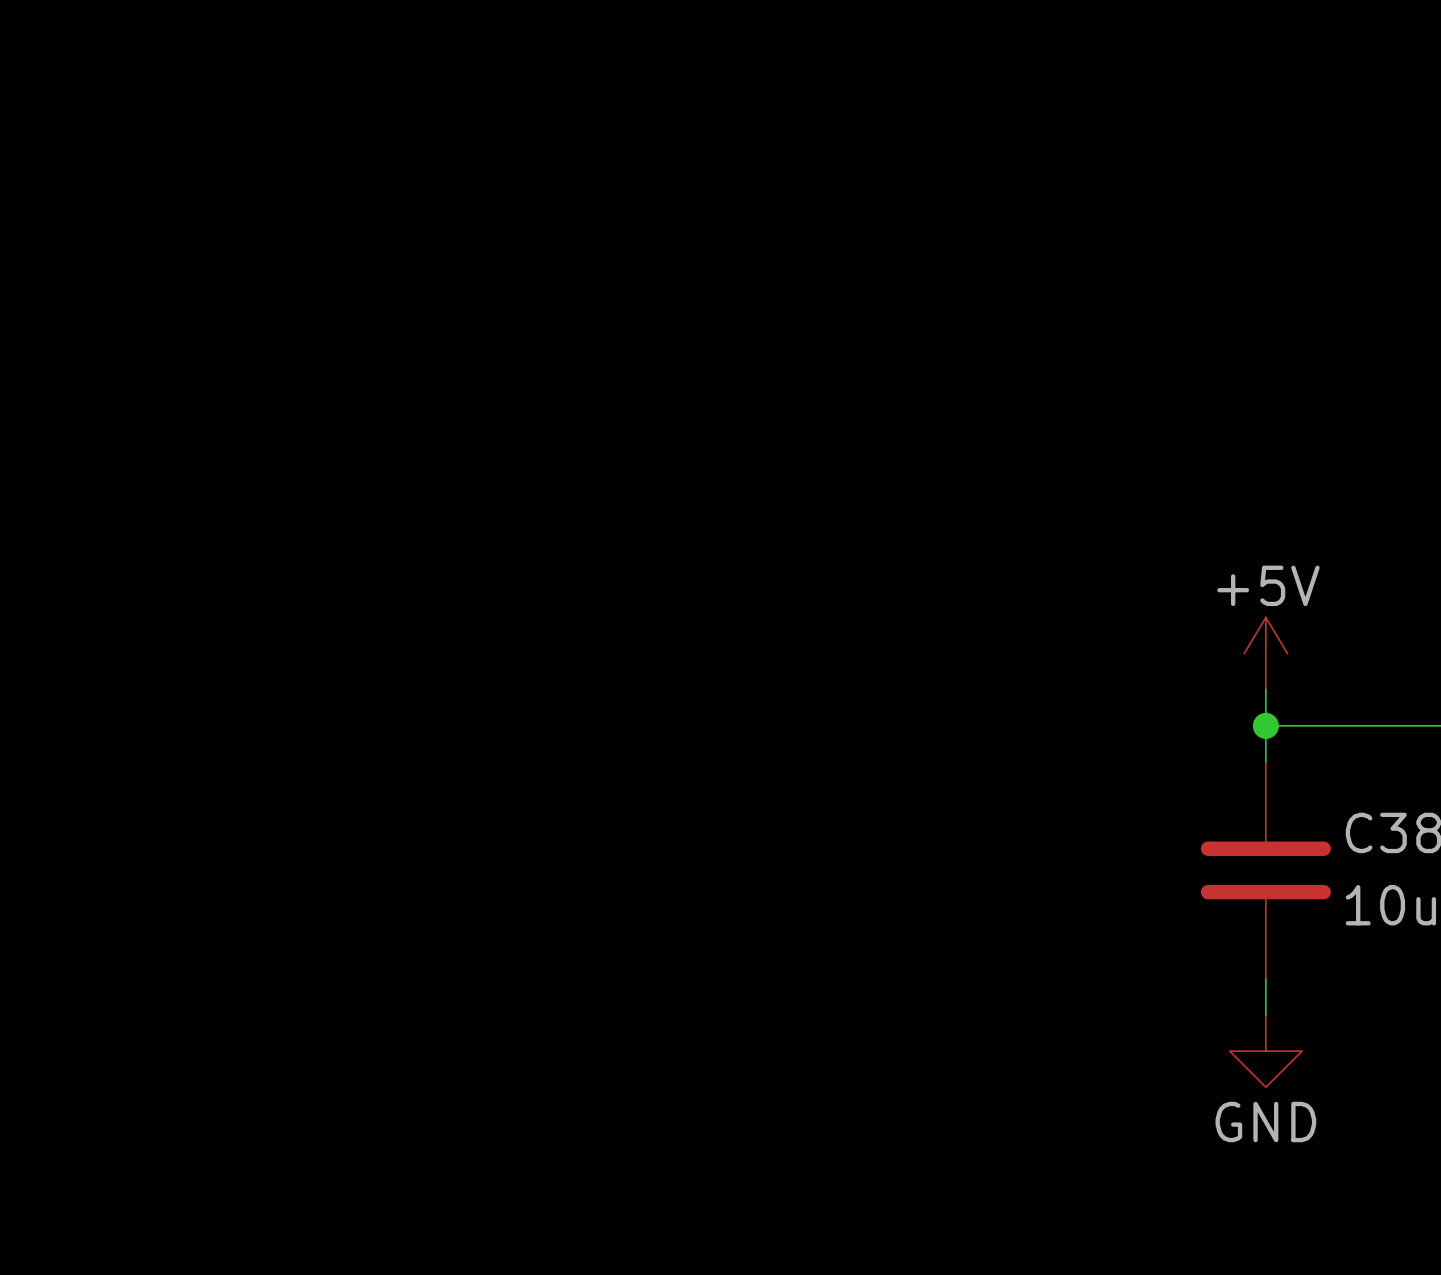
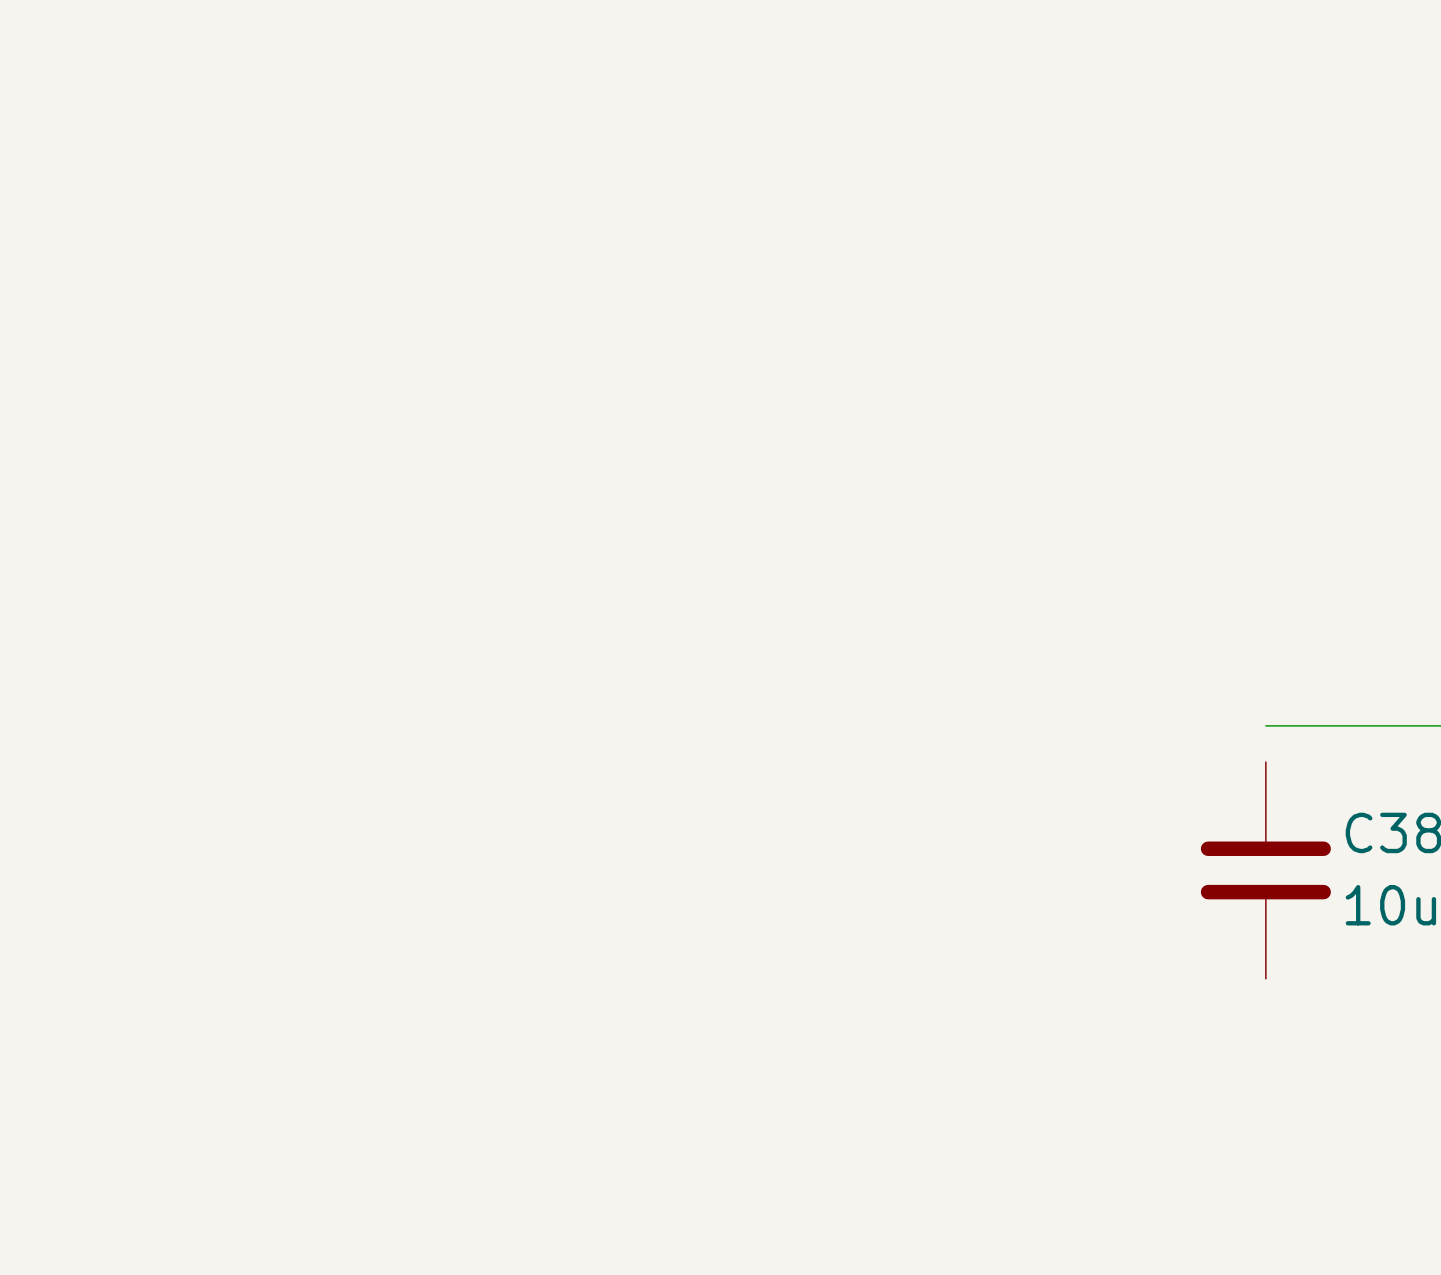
power symbol: +5V (1265, 653) -> none
wire: (1265, 689) (1265, 762) -> none
junction: (1265, 725) -> none
wire: (1265, 978) (1265, 1014) -> none
power symbol: GND (1265, 1051) -> none

